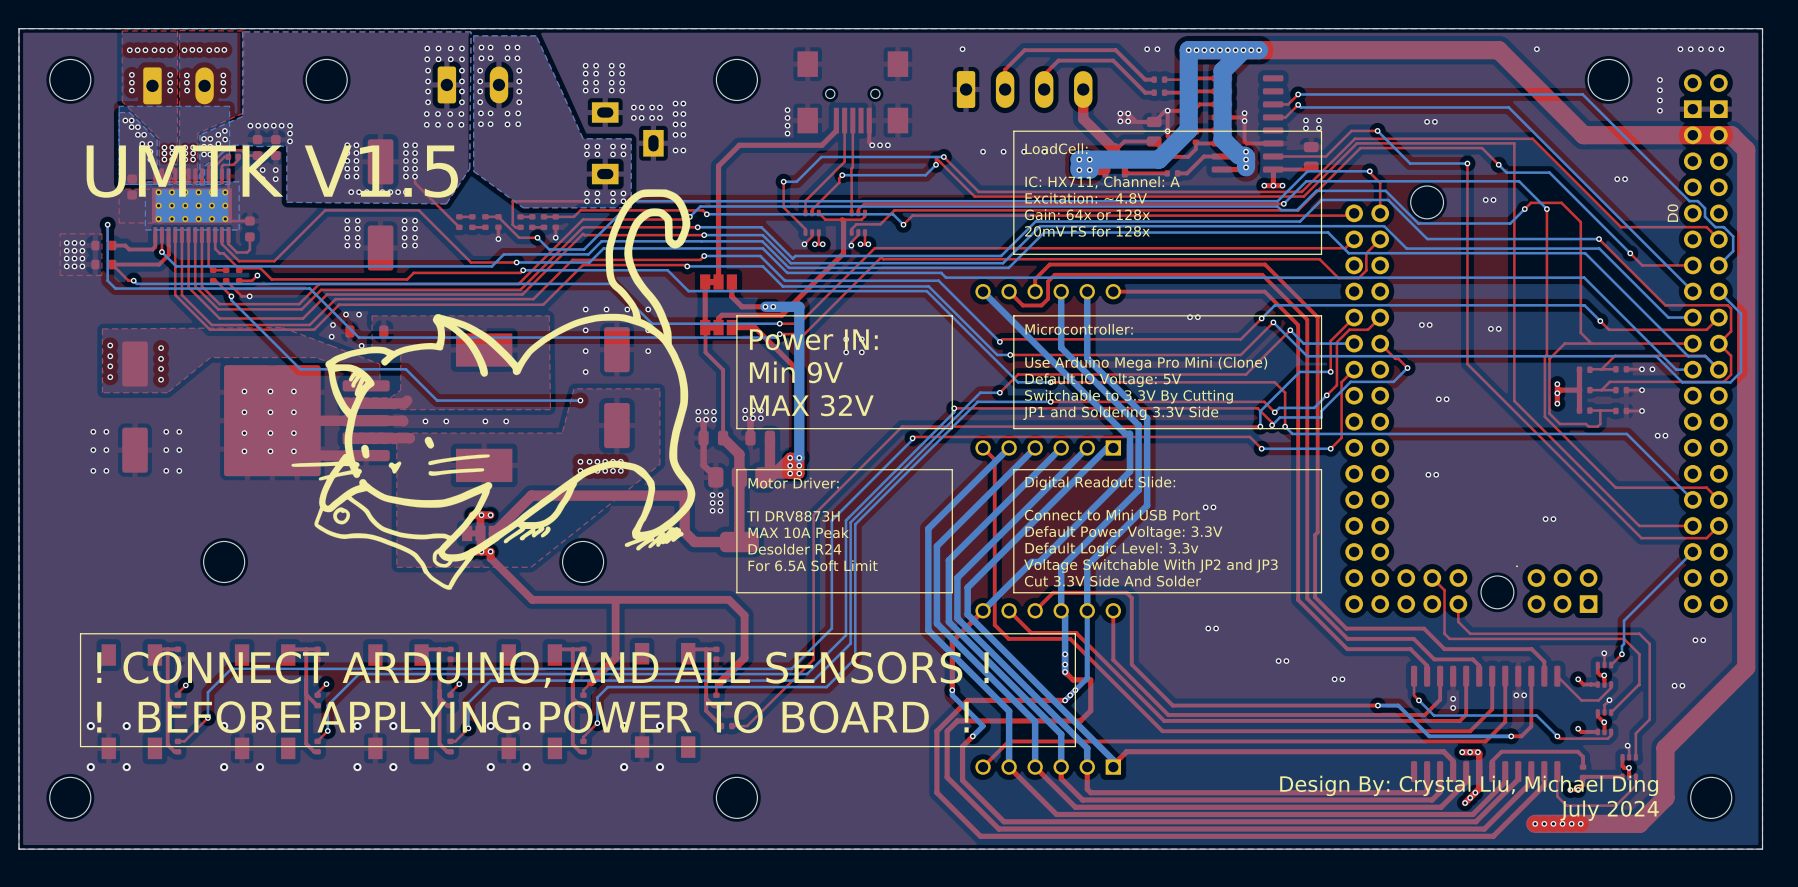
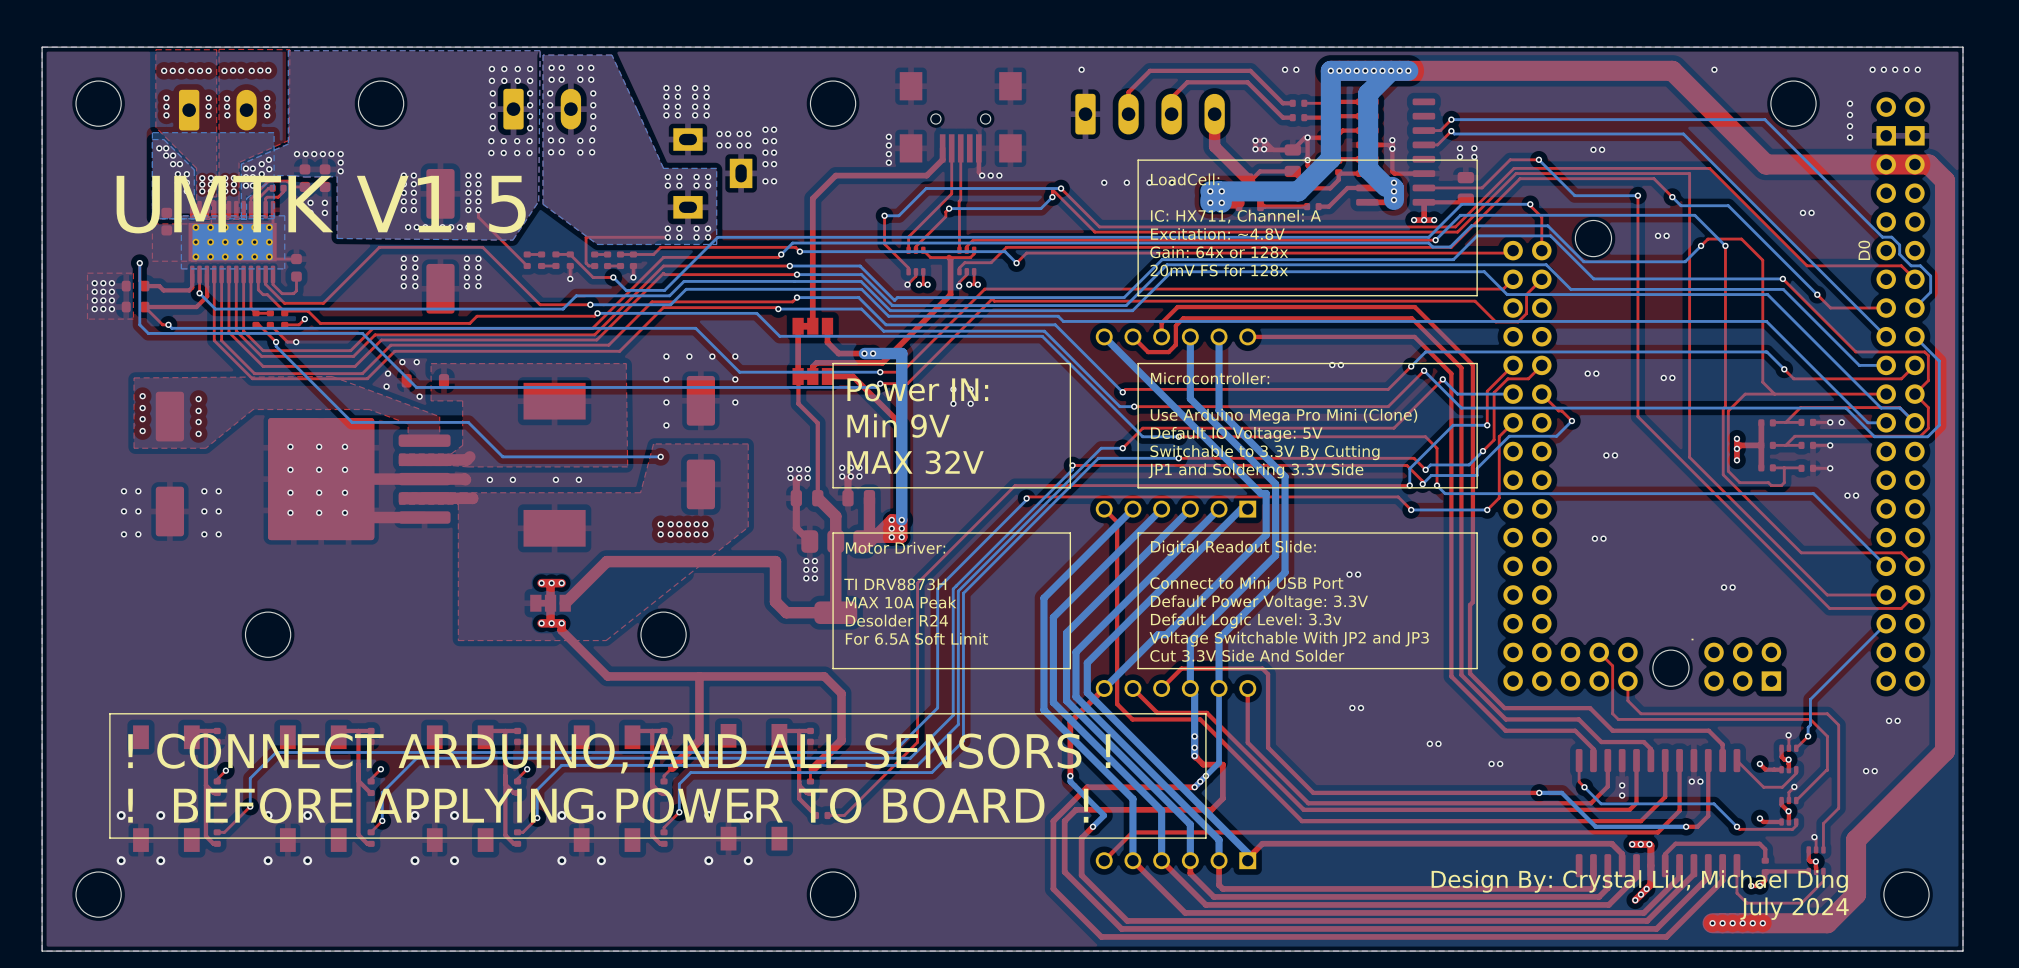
drawing: [291, 189, 696, 590] -> none

